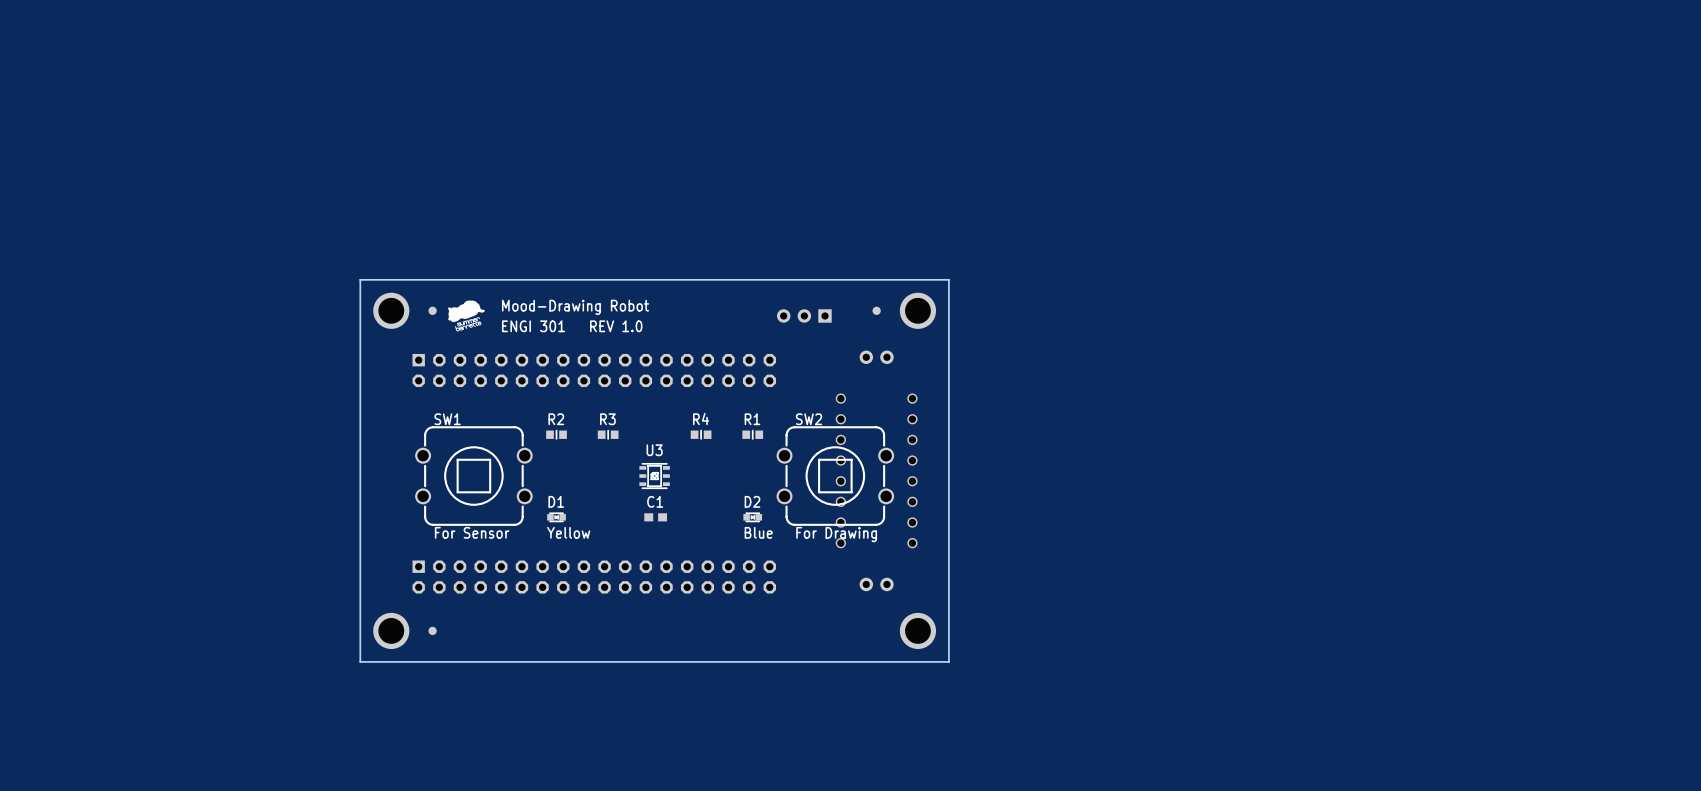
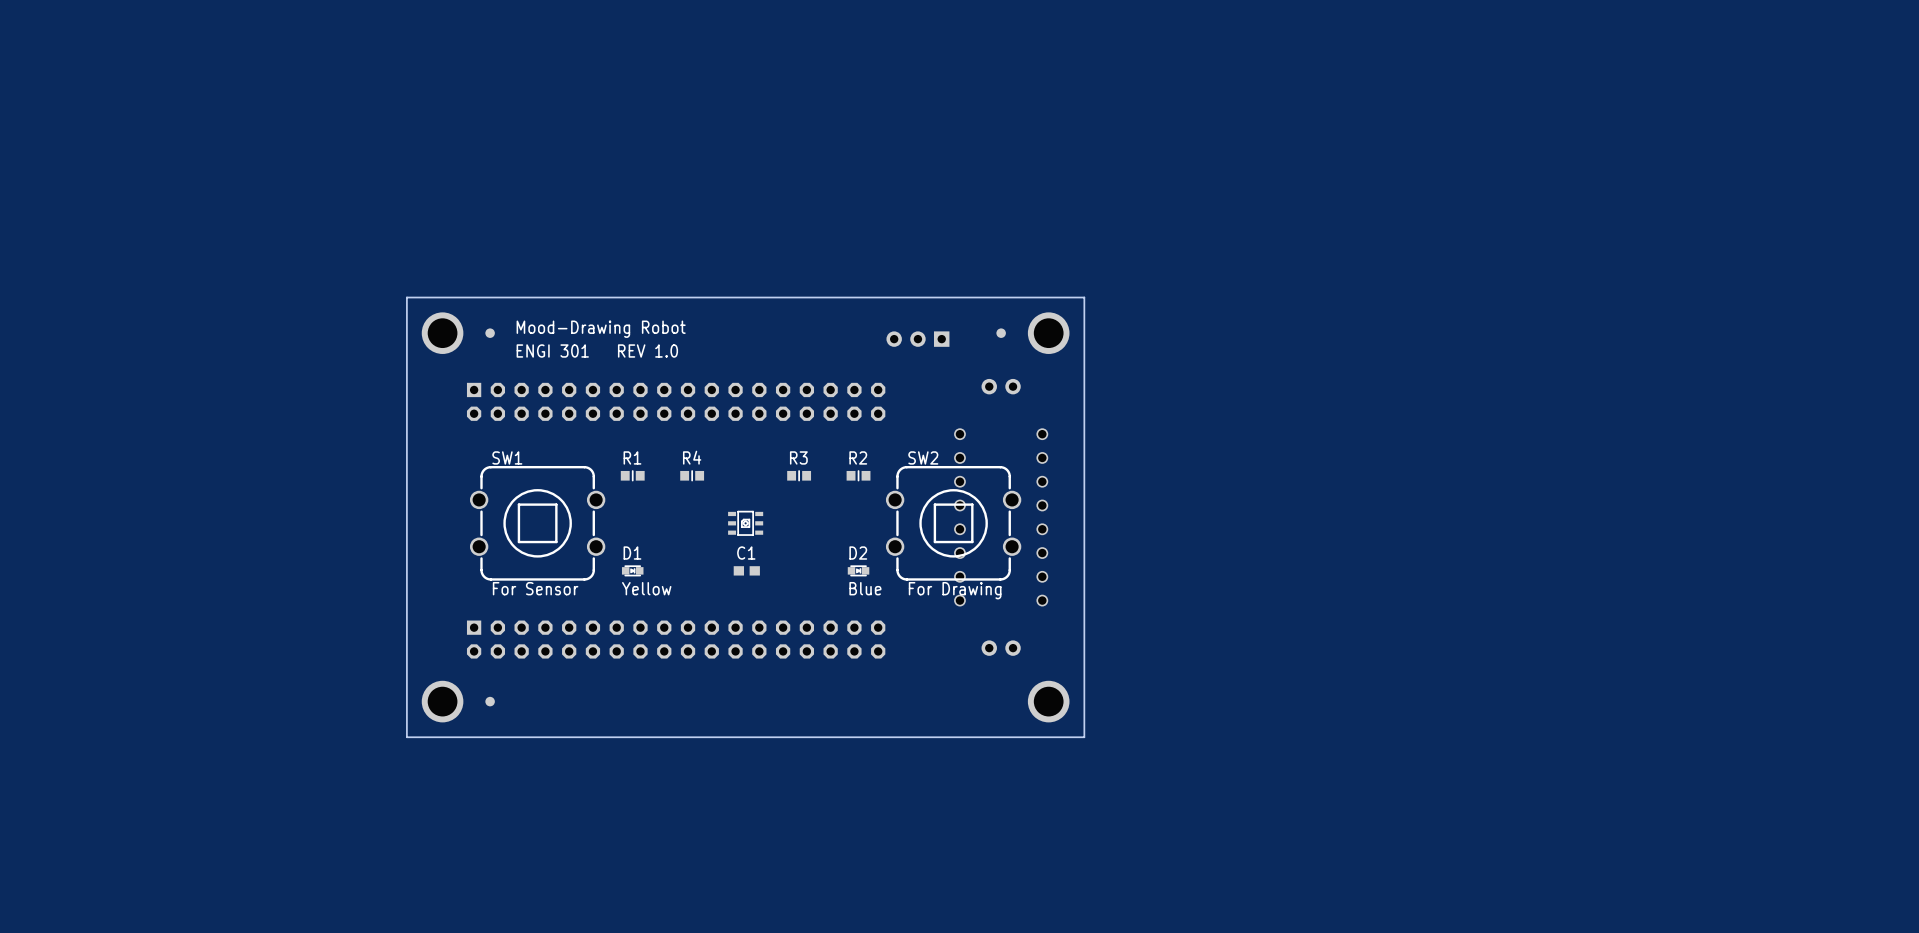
drawing: [448, 300, 485, 332] -> none
text position: Mood-Drawing Robot (575, 307) -> Mood-Drawing Robot (601, 329)
text position: ENGI 301 (533, 326) -> ENGI 301 (552, 351)
text position: REV 1.0 (616, 326) -> REV 1.0 (647, 351)
R4 name: R4 (701, 418) -> R3 (798, 457)
R2 name: R2 (556, 419) -> R1 (632, 457)
R3 name: R3 (607, 419) -> R4 (692, 457)
R1 name: R1 (752, 419) -> R2 (858, 457)
text: U3 (654, 450) -> none
part footprint: [639, 463, 670, 489] -> [728, 511, 764, 536]

